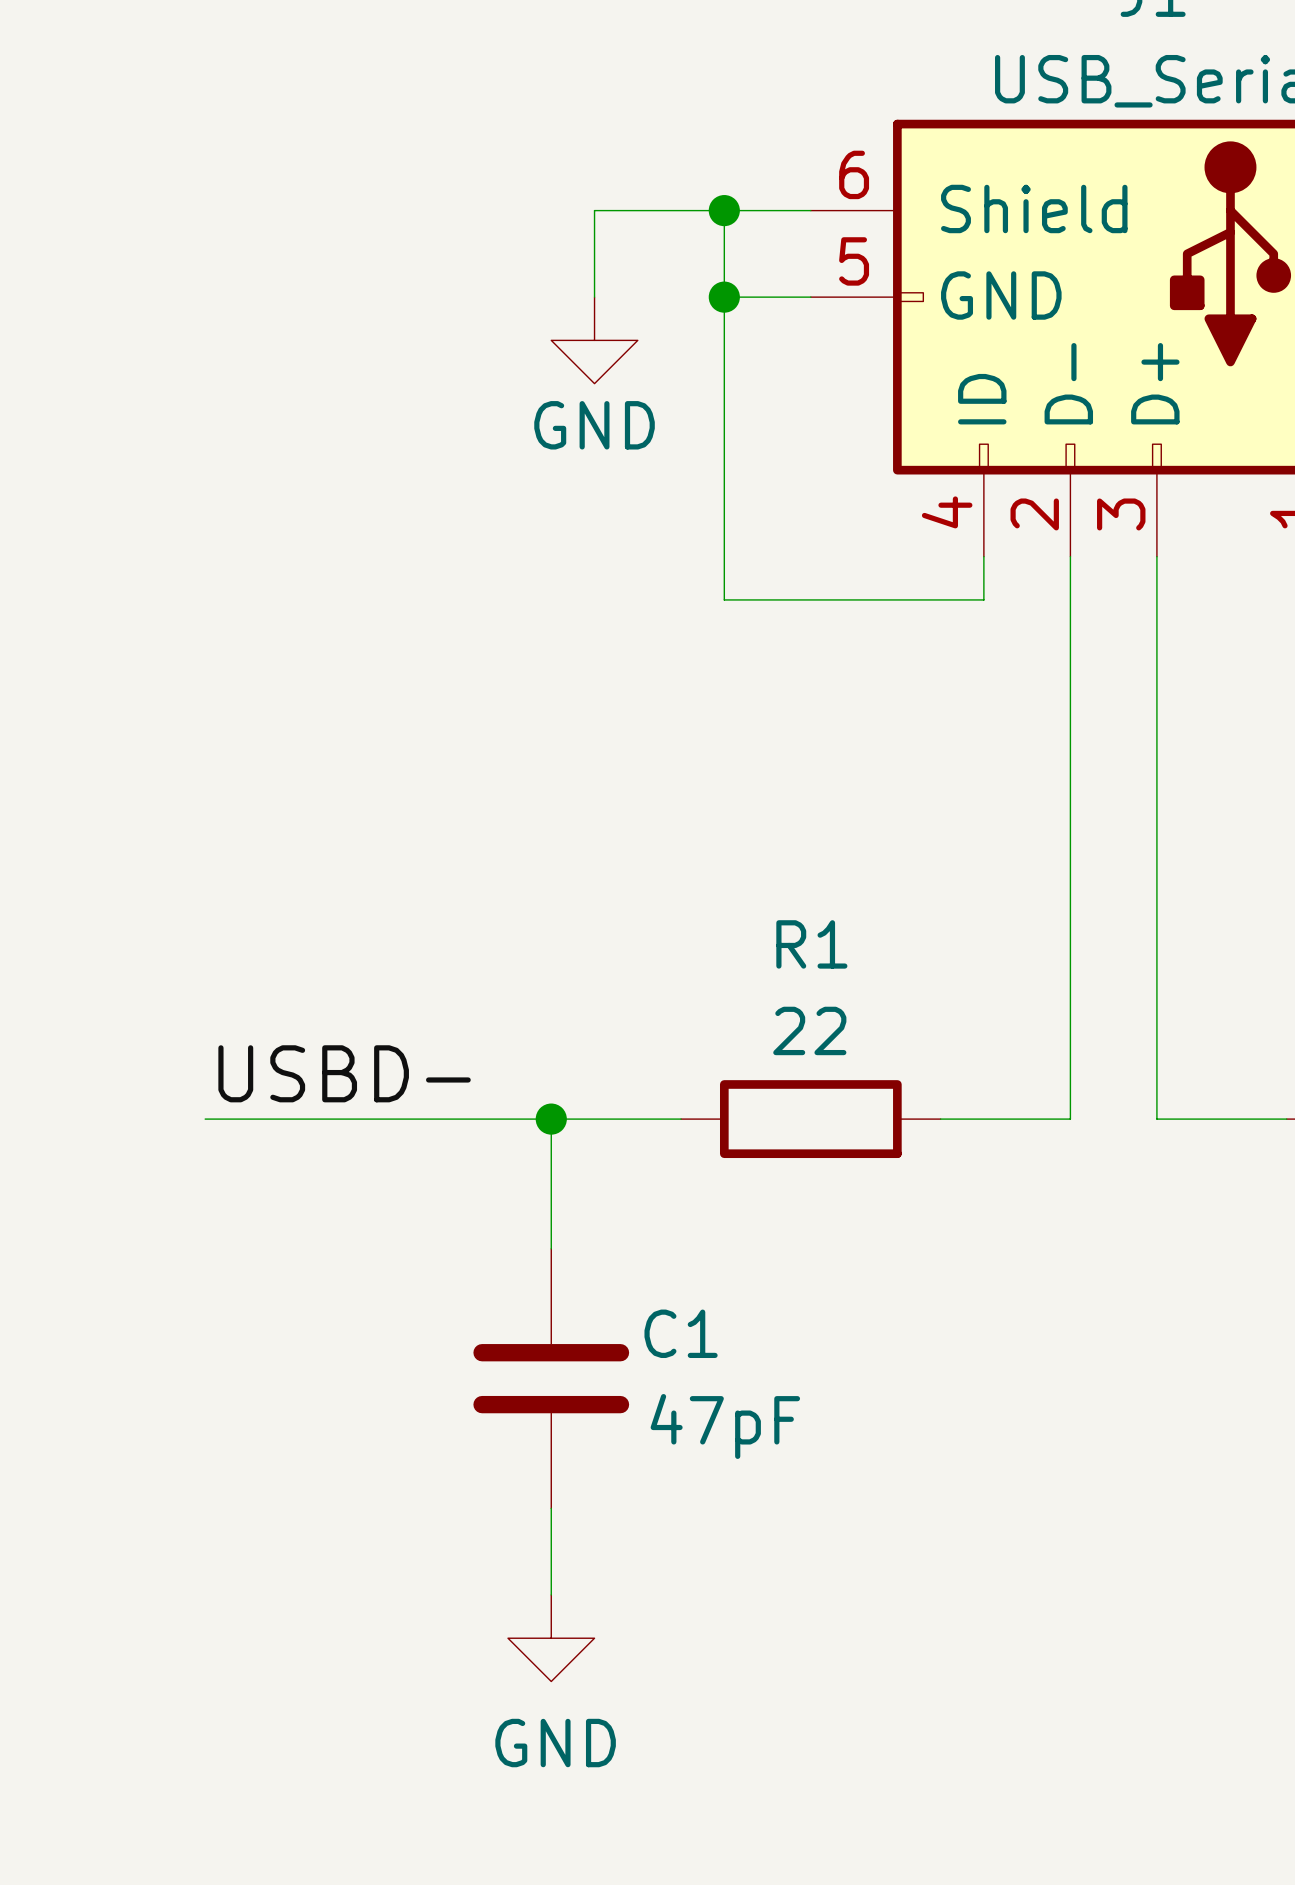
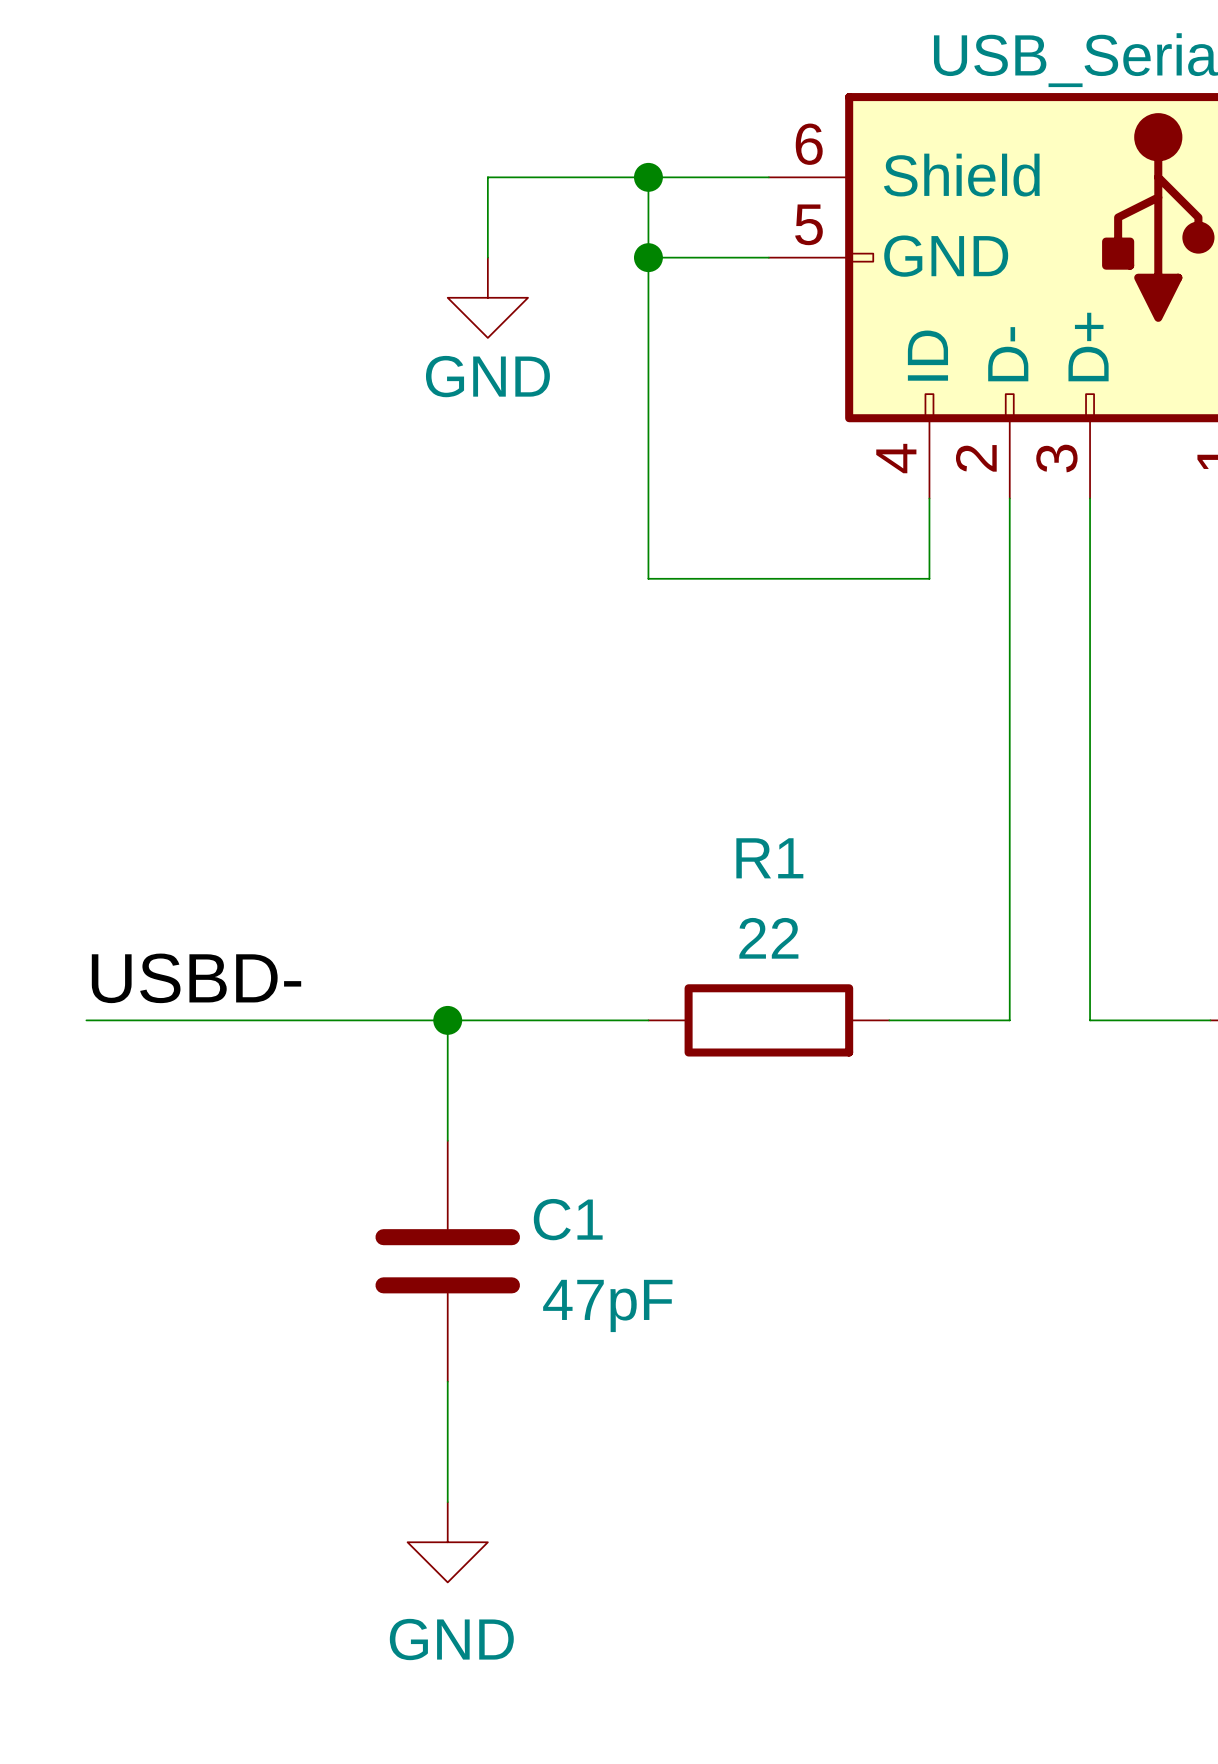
wire: (594, 210) (594, 297) -> (568, 177) (487, 177) (487, 257)
wire: (724, 210) (724, 599) (983, 599) -> (648, 177) (648, 578) (929, 578) (929, 538)
junction position: (724, 210) -> (648, 177)
wire: none -> (648, 257) (688, 257)
junction position: (724, 297) -> (648, 257)
power symbol position: GND (594, 340) -> GND (487, 297)
label position: USBD- (344, 1073) -> USBD- (196, 978)
wire: none -> (86, 1020) (206, 1020)
wire: (551, 1119) (551, 1248) -> (447, 1020) (447, 1140)
junction position: (551, 1119) -> (447, 1020)
C1 position: (551, 1378) -> (447, 1261)
wire: none -> (447, 1381) (447, 1502)
wire: (551, 1508) (551, 1594) -> none
power symbol position: GND (551, 1638) -> GND (447, 1542)

